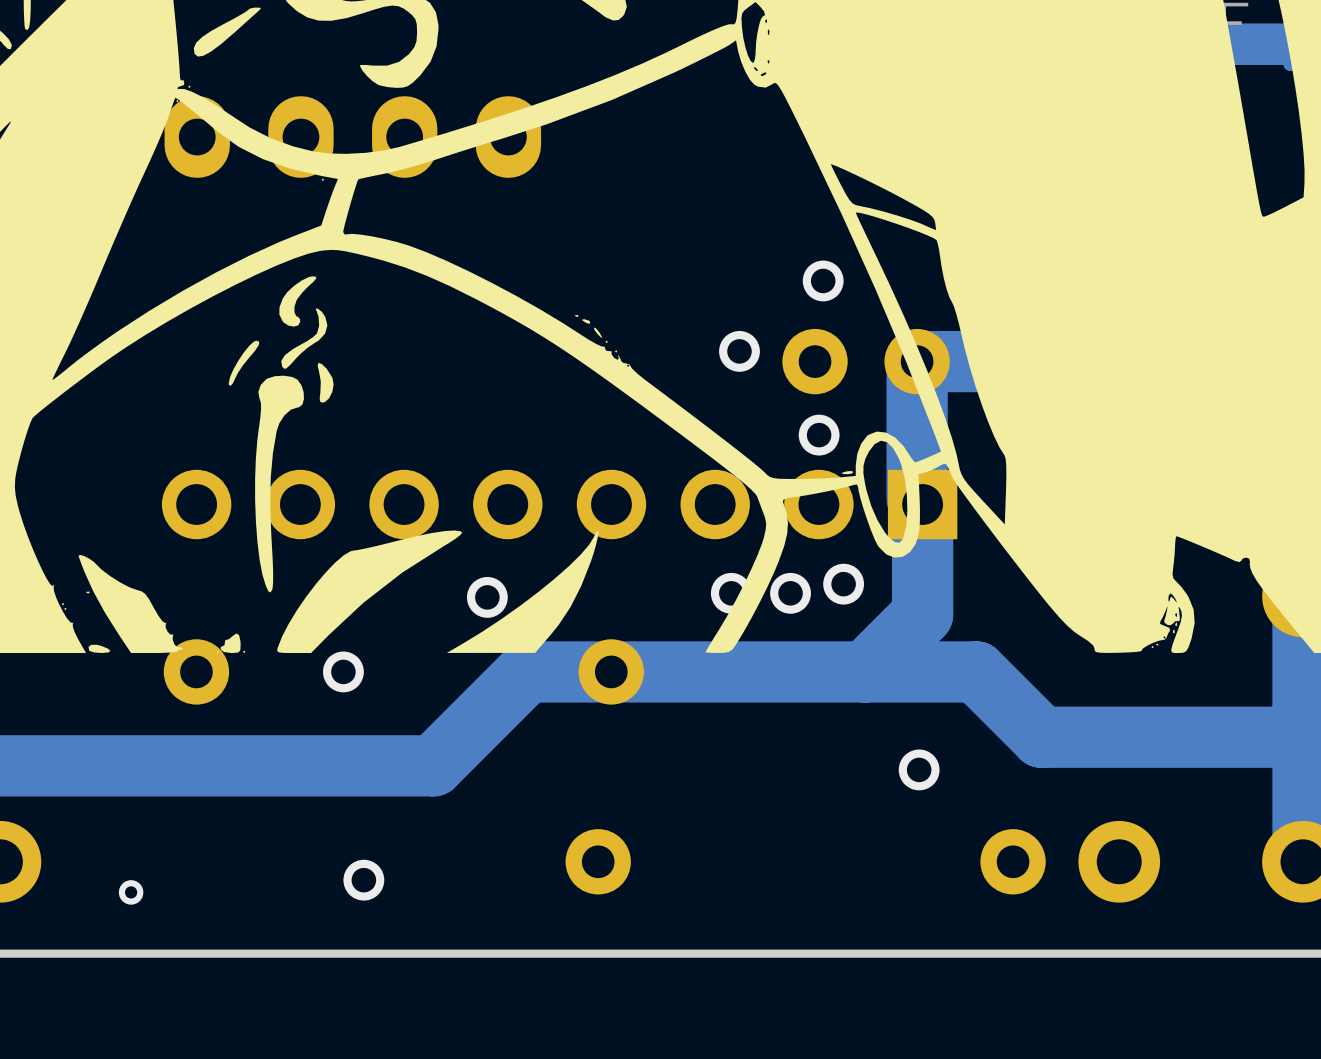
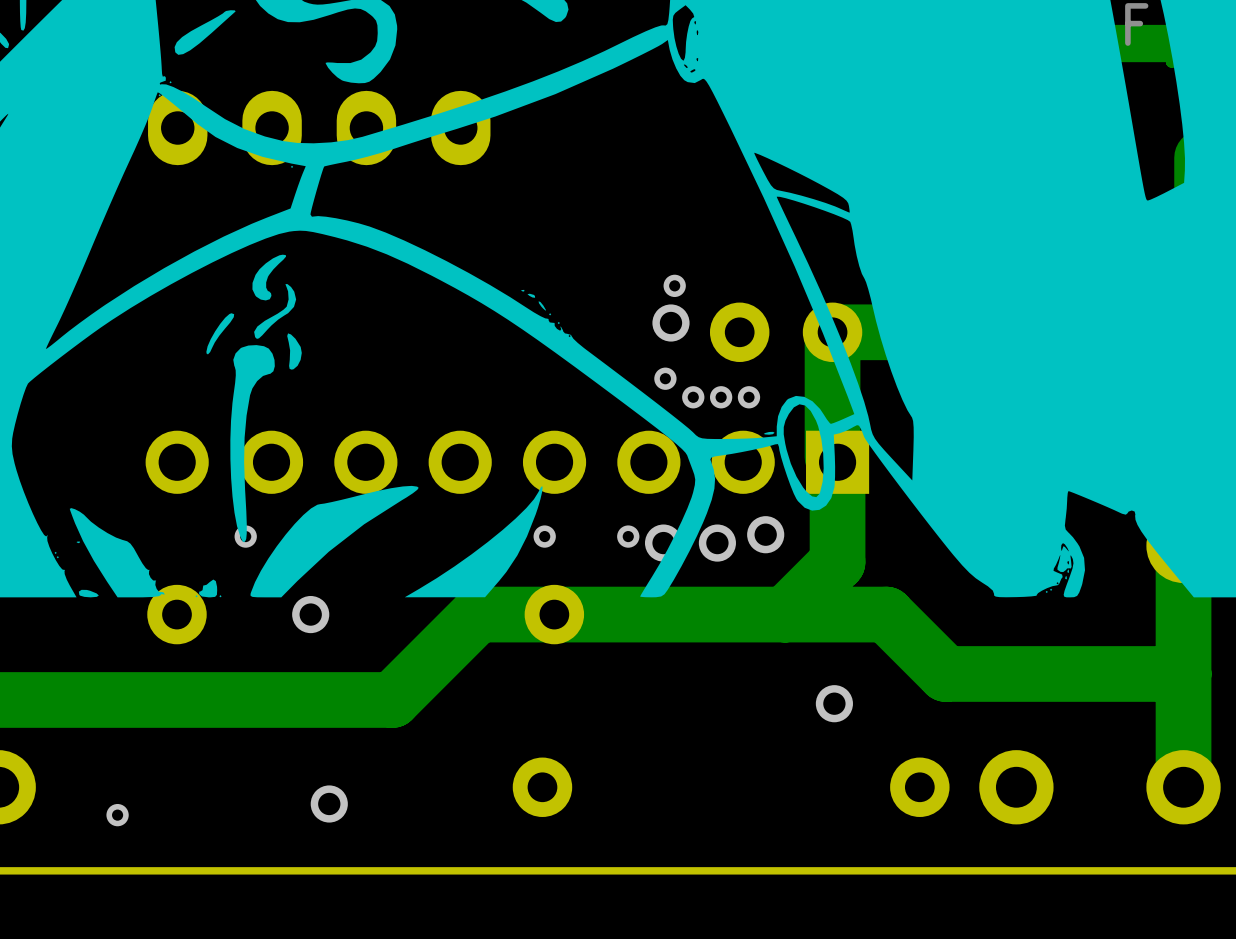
via: (823, 280) -> none
via: none -> (674, 285)
via: none -> (665, 378)
via size: [798, 414, 840, 456] -> [737, 386, 761, 409]
via: none -> (693, 397)
via: none -> (721, 397)
via: none -> (245, 536)
via: none -> (544, 536)
via: none -> (628, 536)
via: (487, 597) -> none

